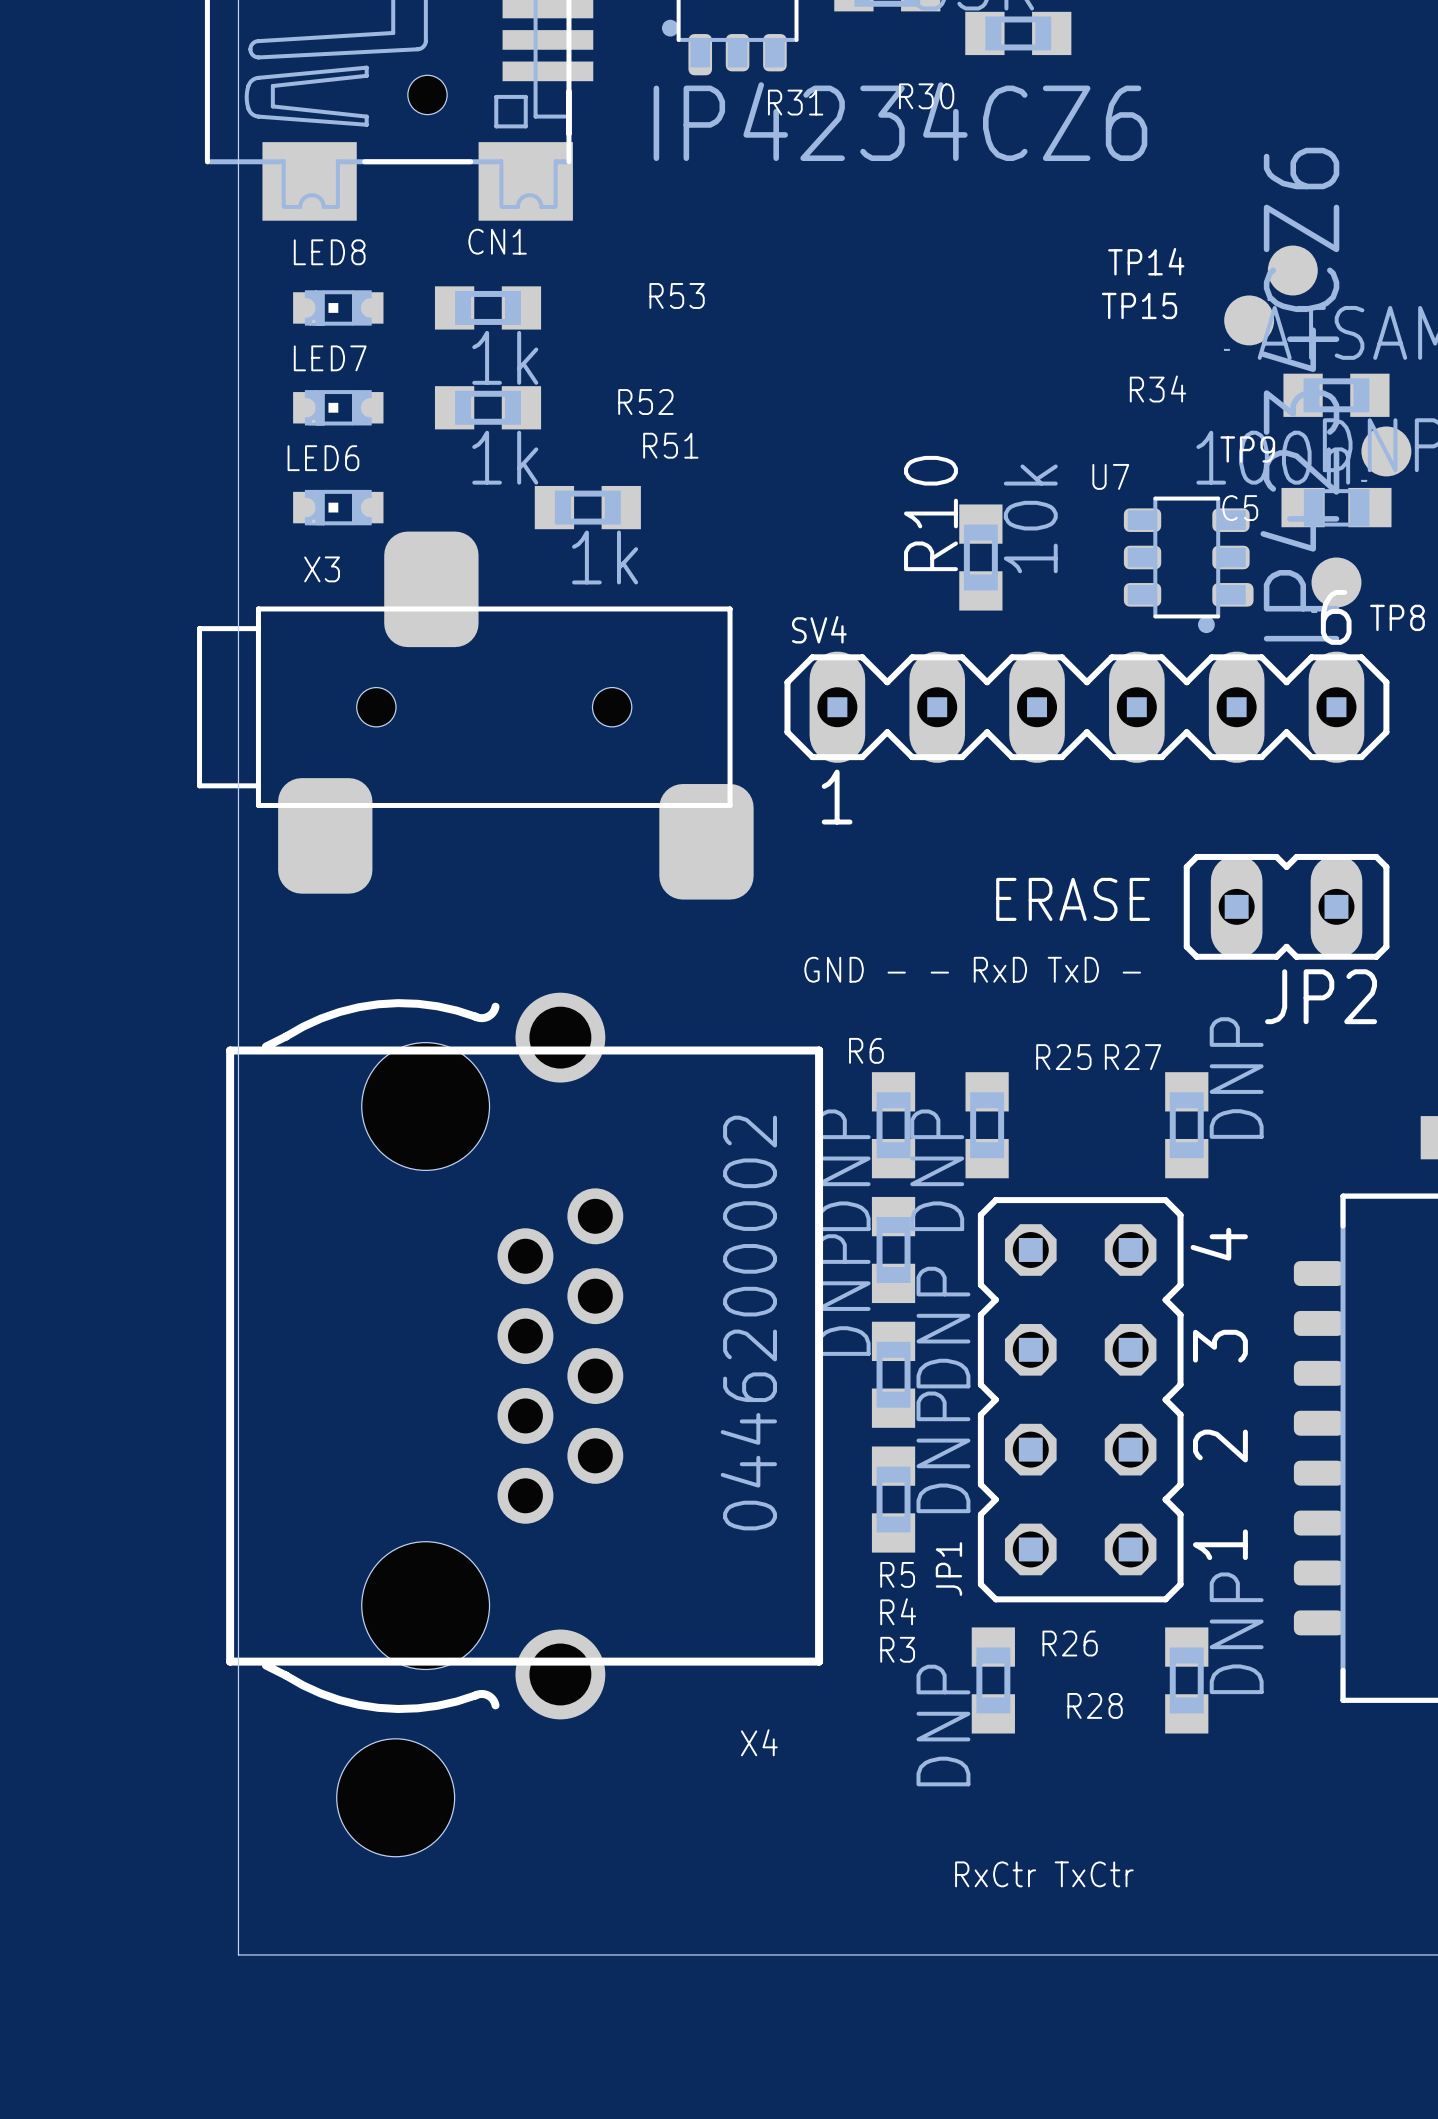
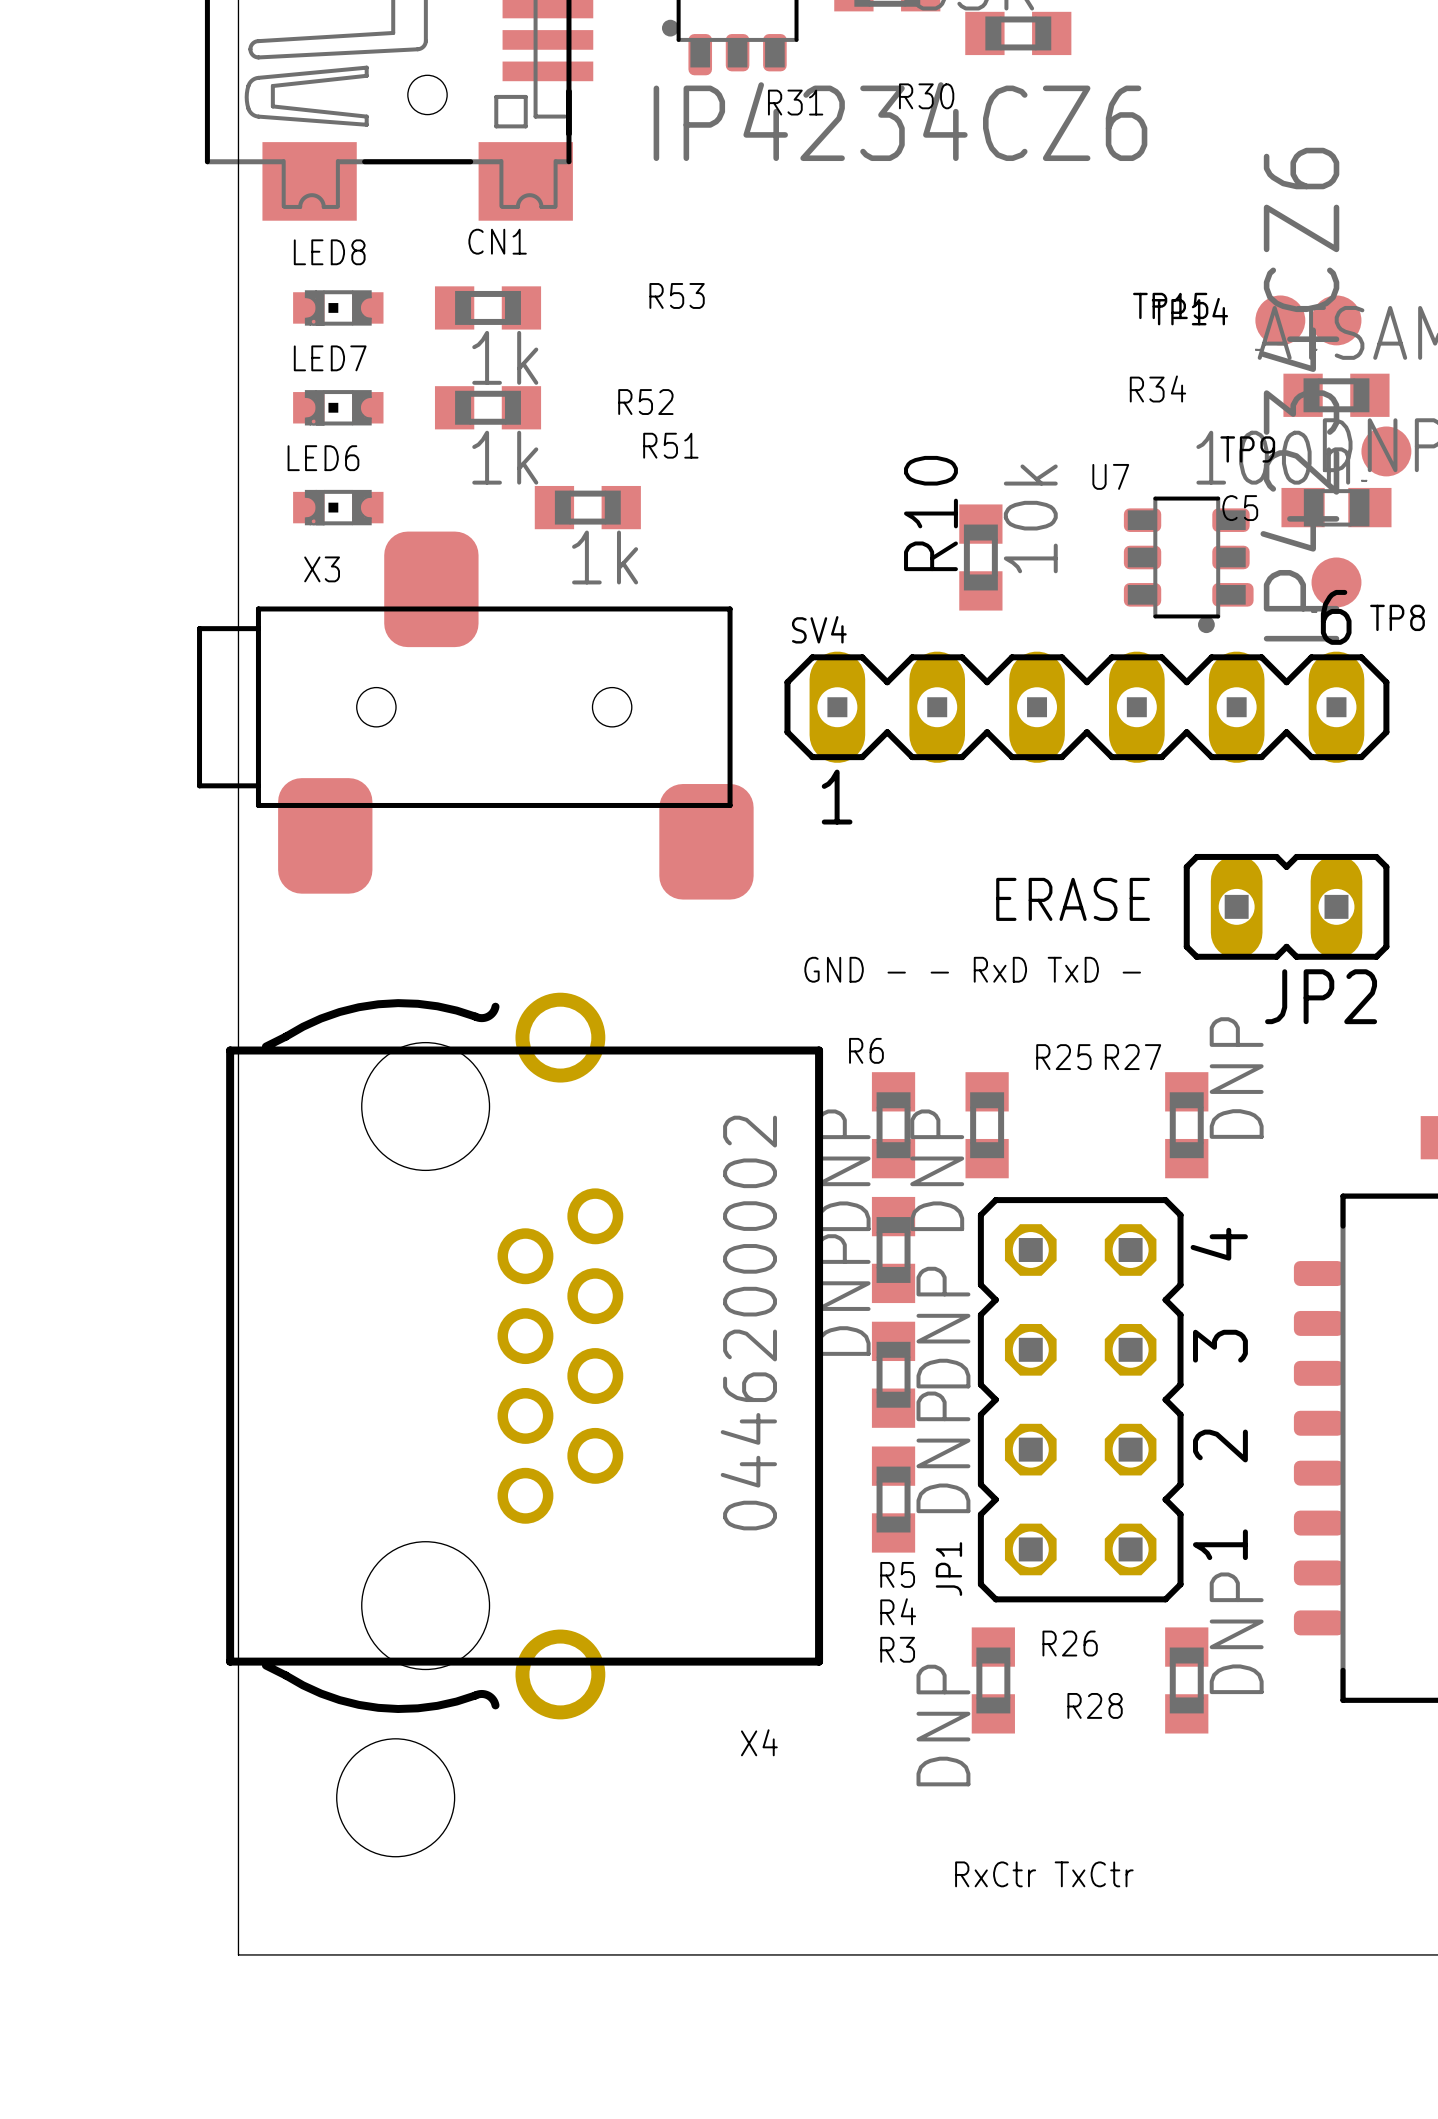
TP14 position: (1292, 270) -> (1336, 320)
TP15 position: (1249, 320) -> (1280, 320)

